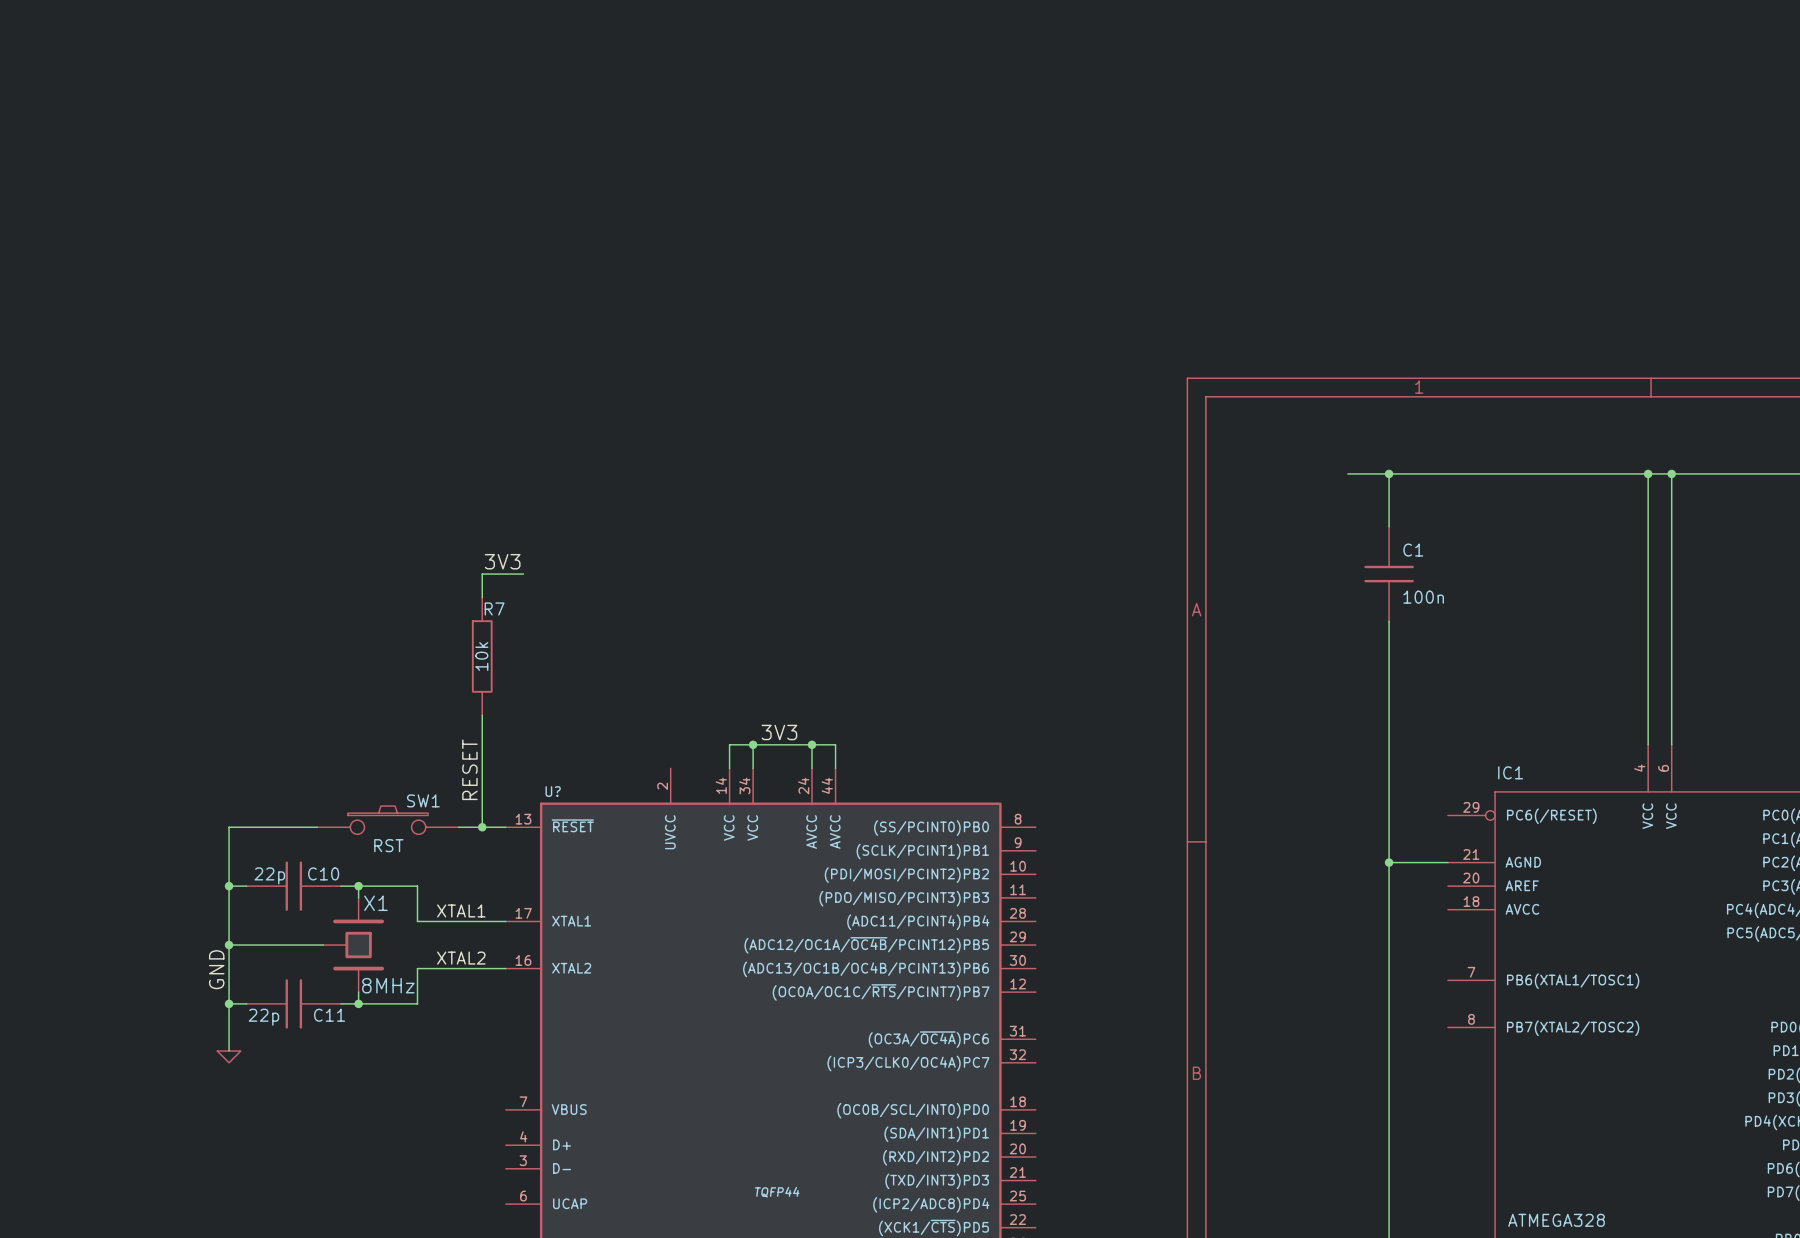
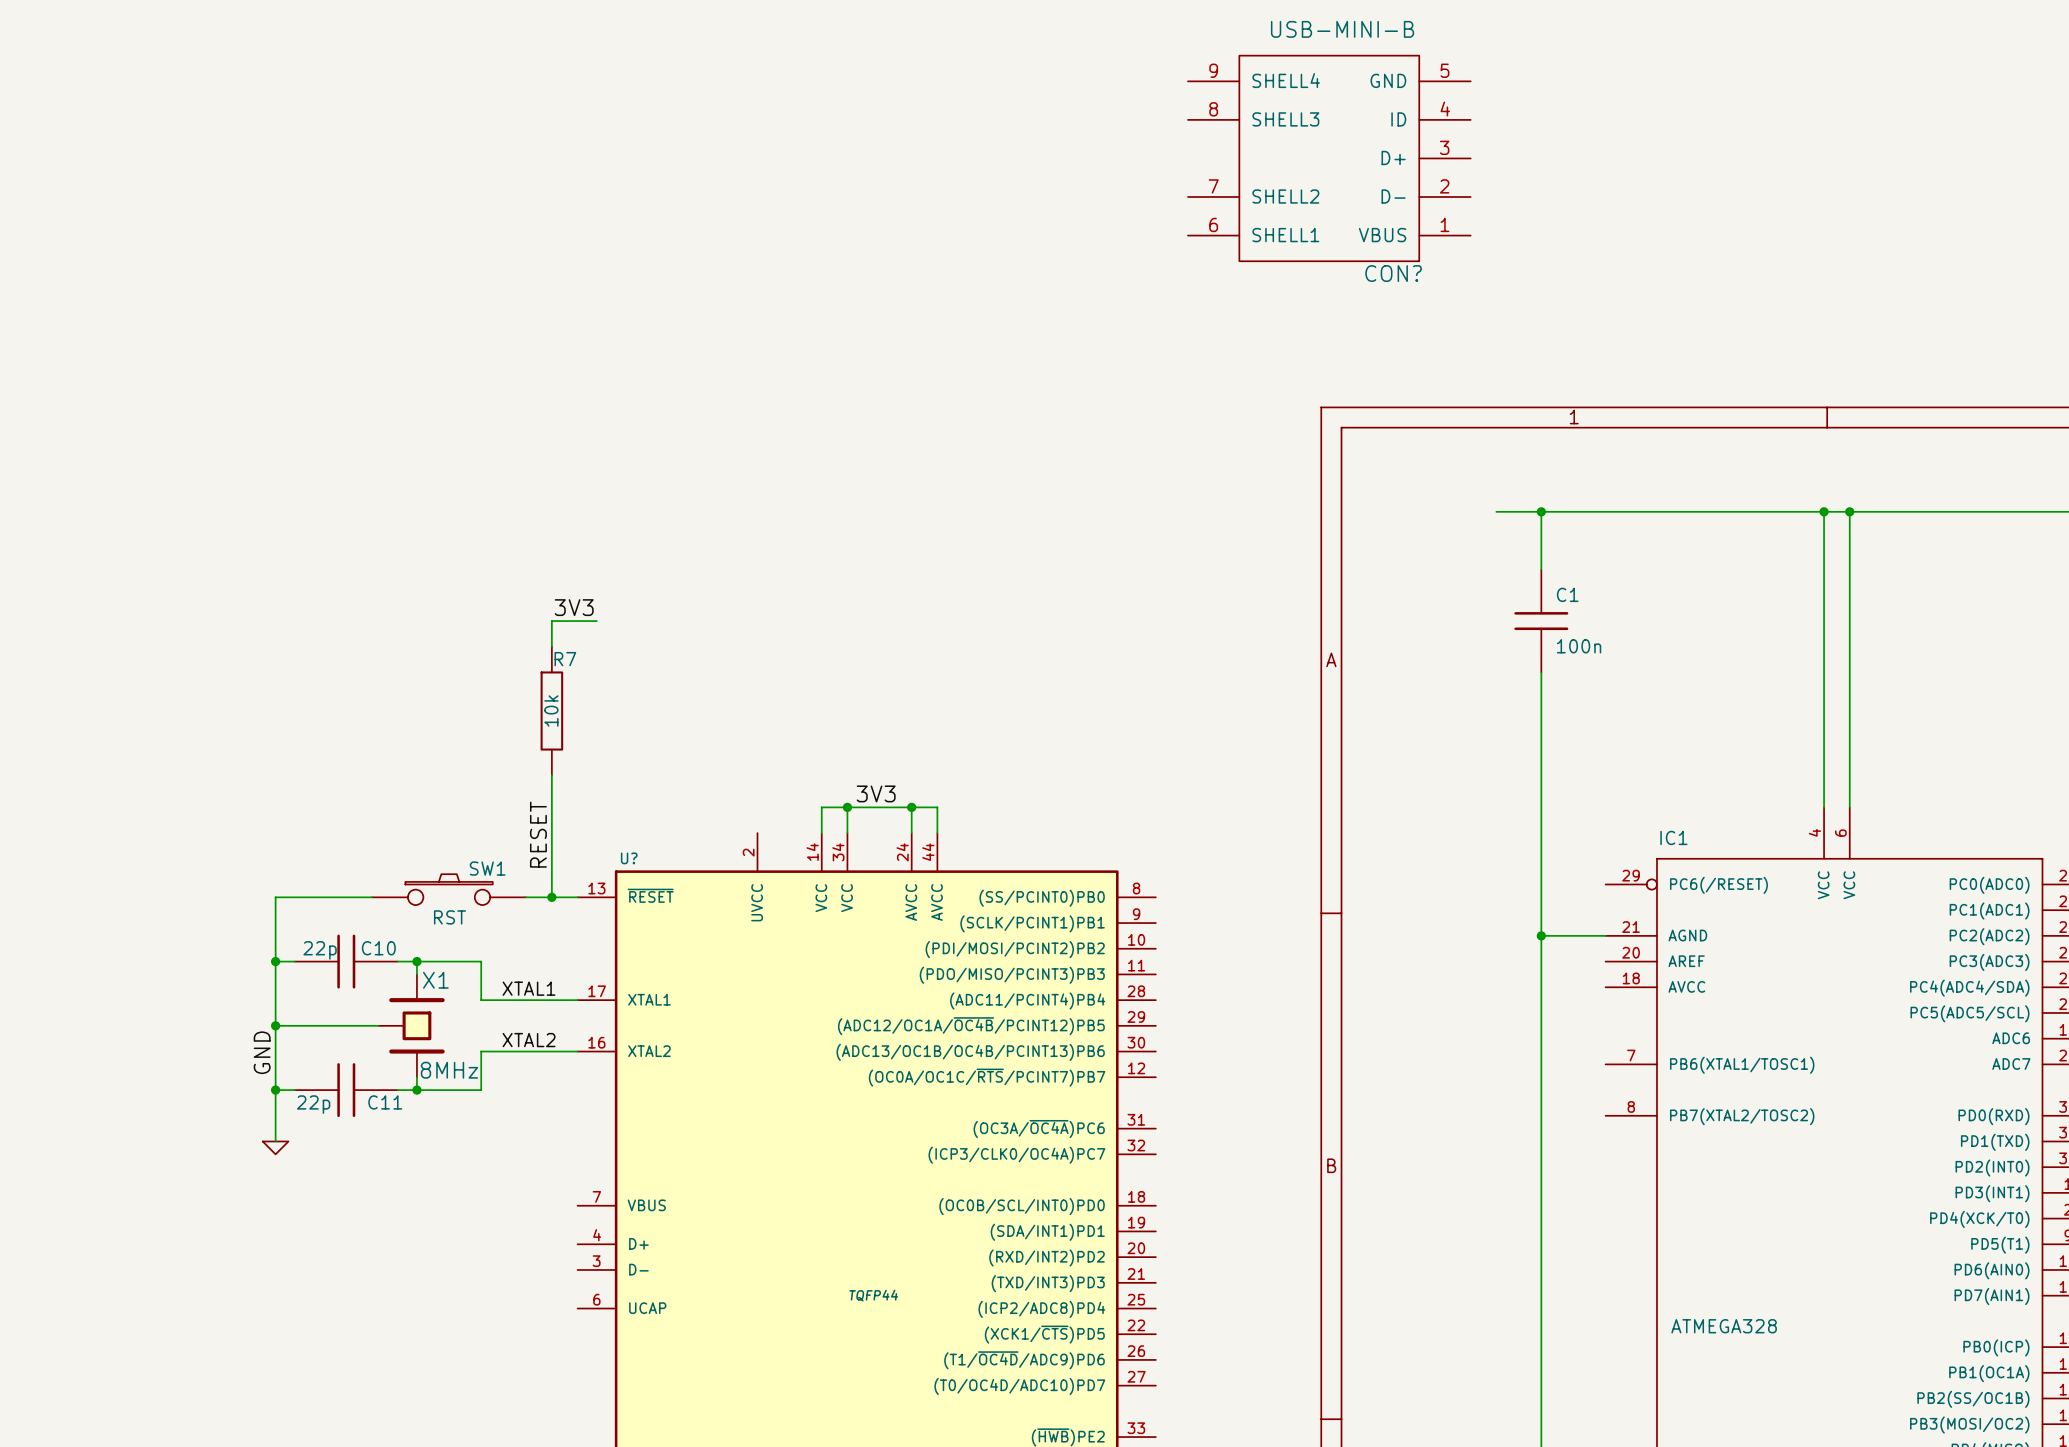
CON?: none -> USB-MINI-B (1329, 158)

